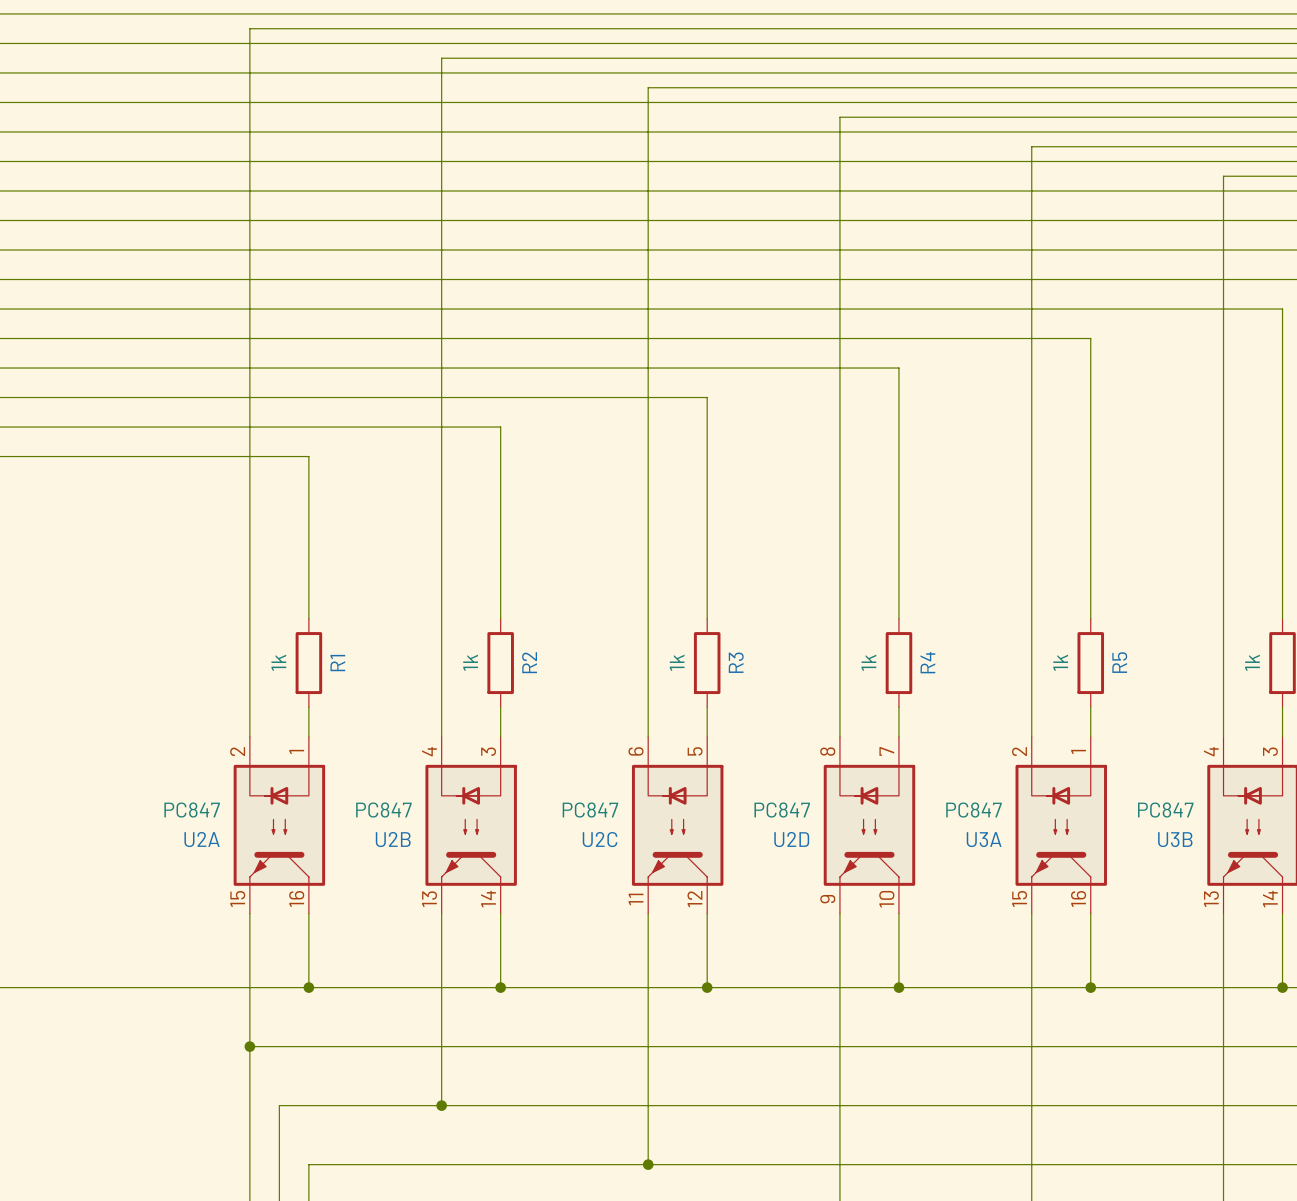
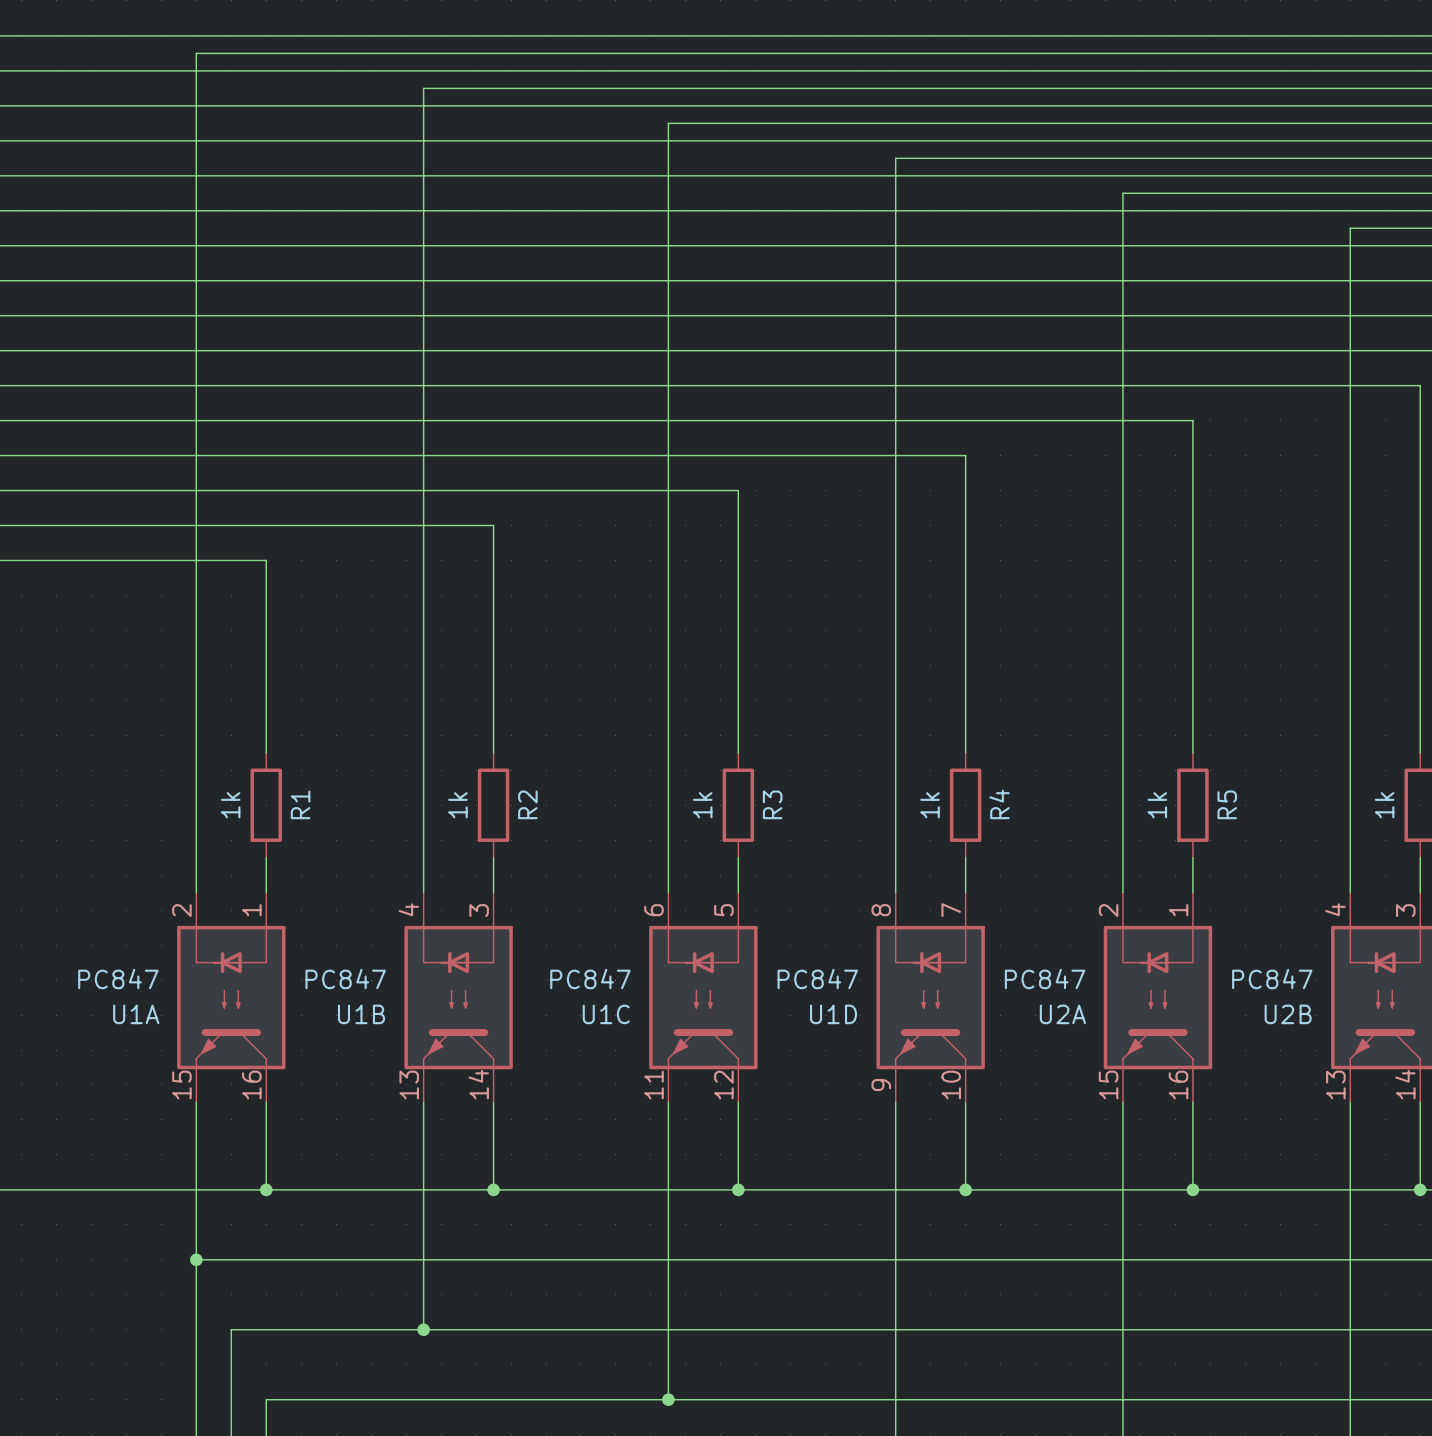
U2A name: U2A (202, 839) -> U1A (136, 1014)
U2B name: U2B (393, 839) -> U1B (361, 1014)
U2C name: U2C (600, 839) -> U1C (606, 1014)
U2D name: U2D (791, 839) -> U1D (833, 1014)
U3A name: U3A (984, 839) -> U2A (1062, 1014)
U3B name: U3B (1175, 839) -> U2B (1288, 1014)

